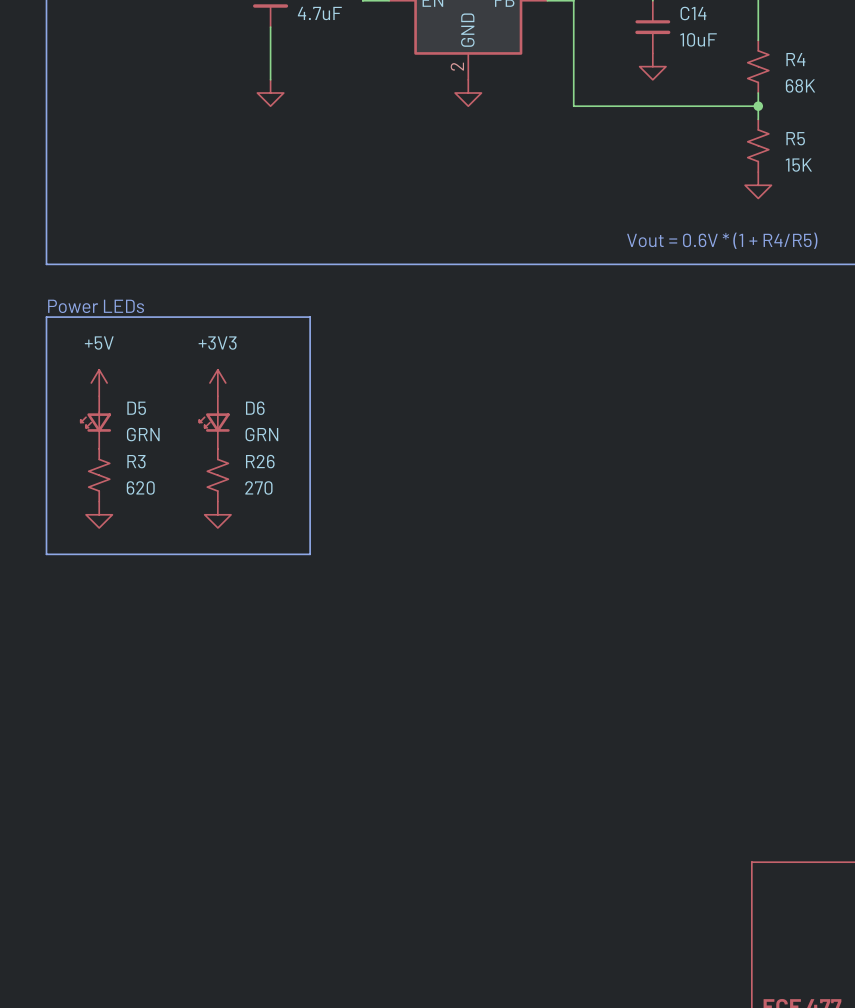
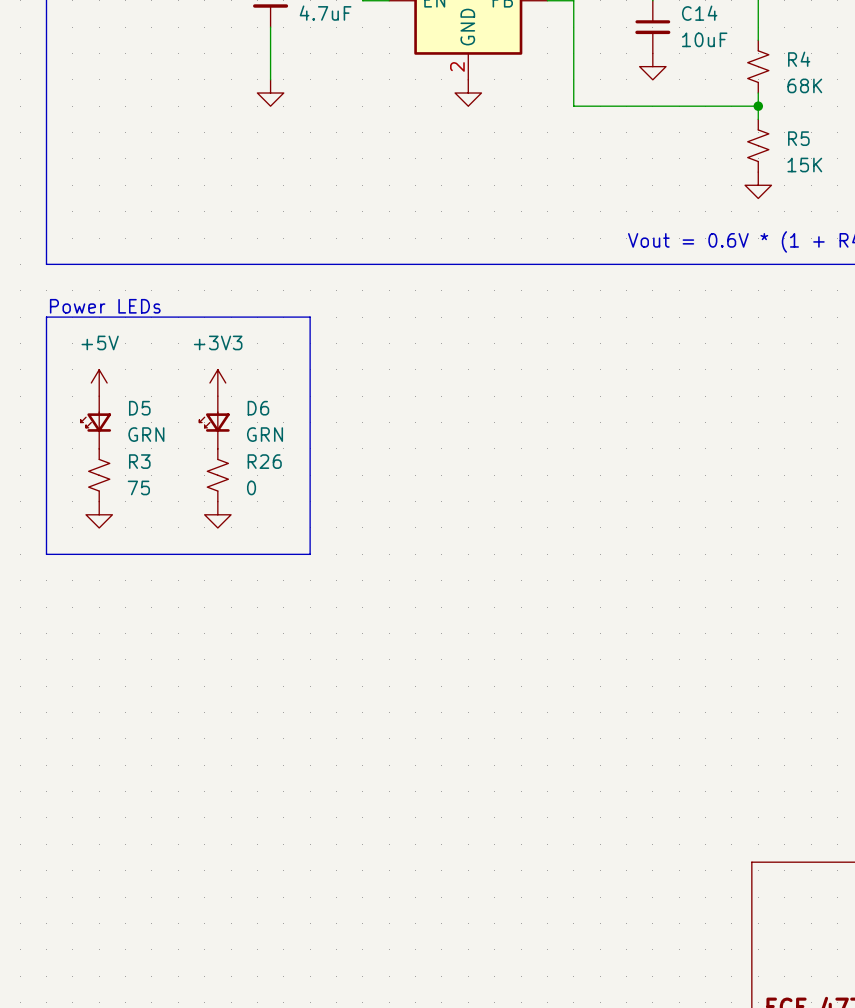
R3 value: 620 (140, 487) -> 75 (138, 487)
R26 value: 270 (258, 487) -> 0 (251, 487)

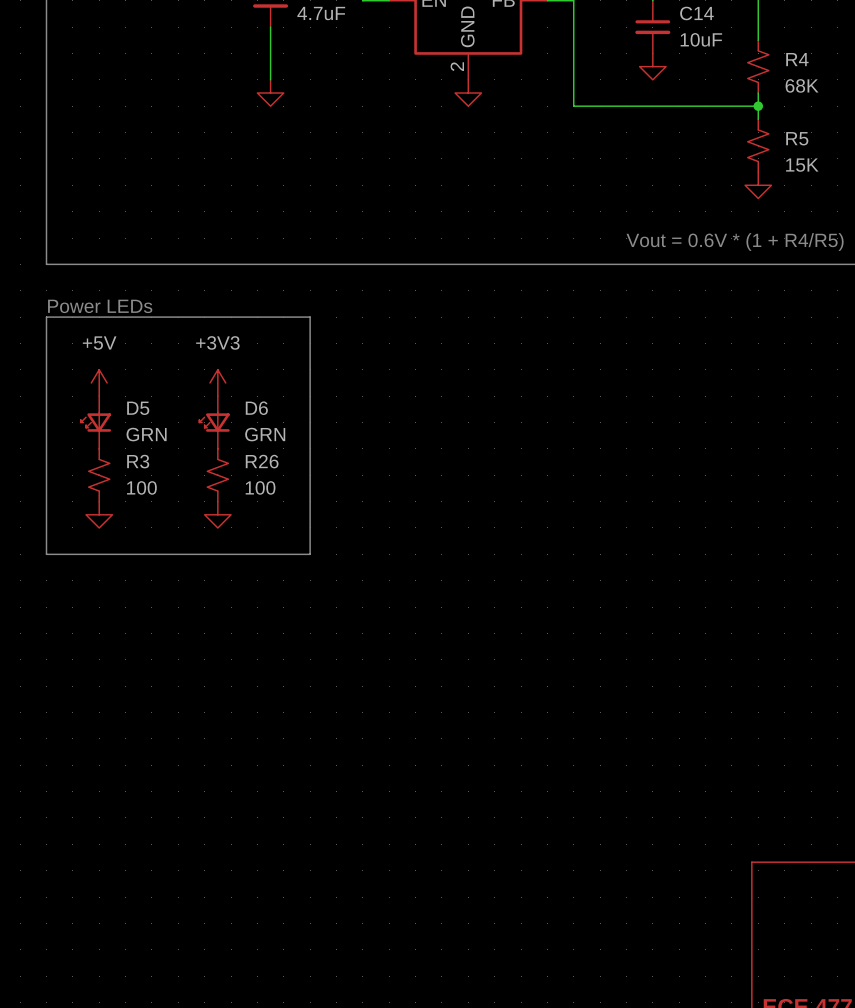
R3 value: 75 (138, 487) -> 100 (141, 487)
R26 value: 0 (251, 487) -> 100 (260, 487)

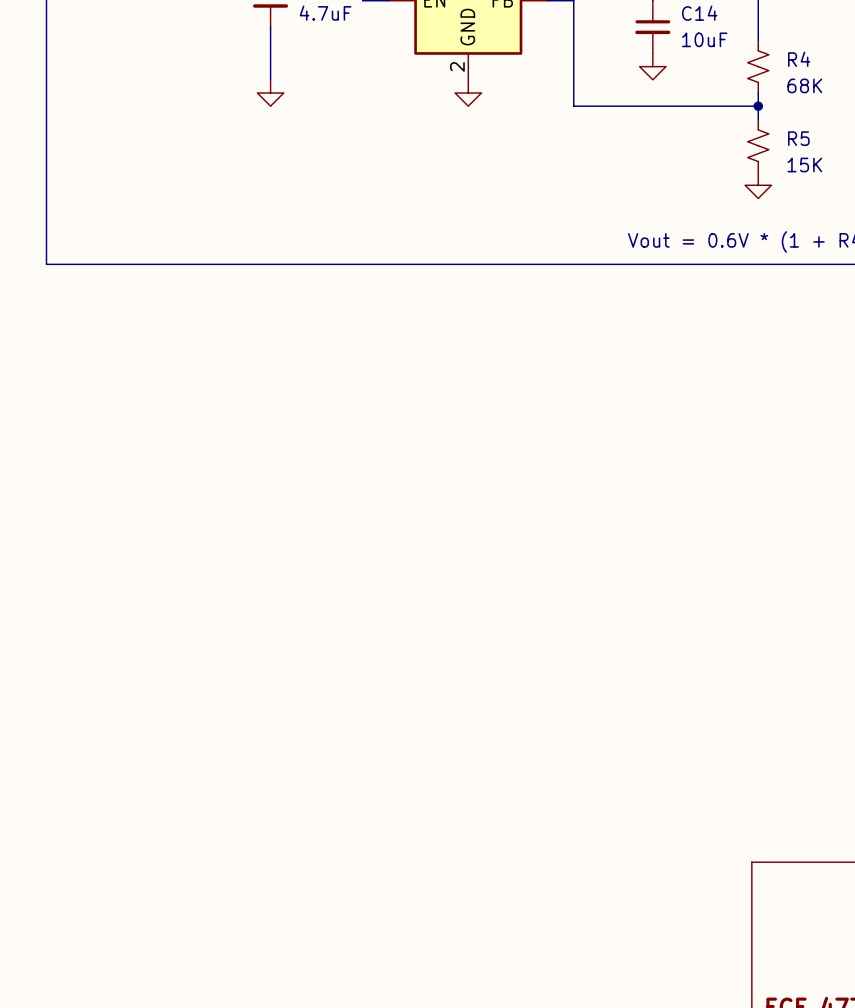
text: Power LEDs (100, 306) -> none
line: (46, 317) (310, 317) (310, 554) (46, 554) (46, 317) -> none
power symbol: +5V (99, 382) -> none
power symbol: +3V3 (217, 382) -> none
D5: GRN (95, 422) -> none
D6: GRN (214, 422) -> none
R3: 100 (99, 475) -> none
R26: 100 (217, 475) -> none
power symbol: (99, 514) -> none
power symbol: (217, 514) -> none

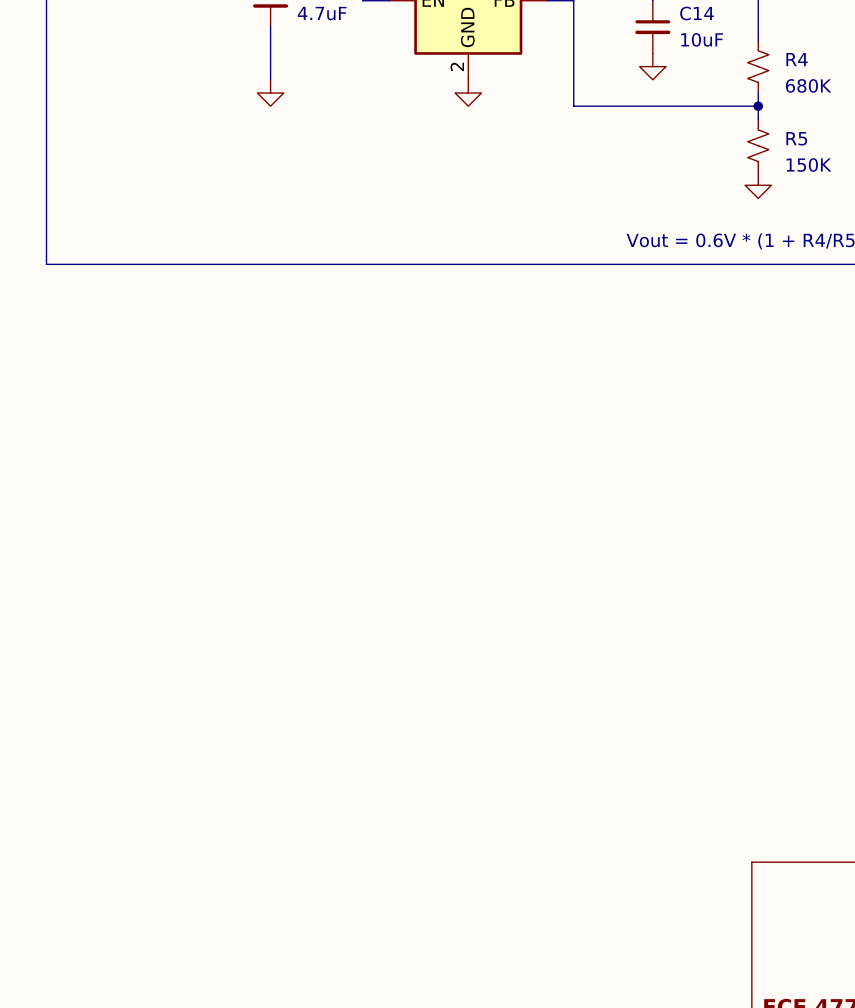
R4 value: 68K (804, 85) -> 680K (808, 85)
R5 value: 15K (804, 165) -> 150K (809, 165)

